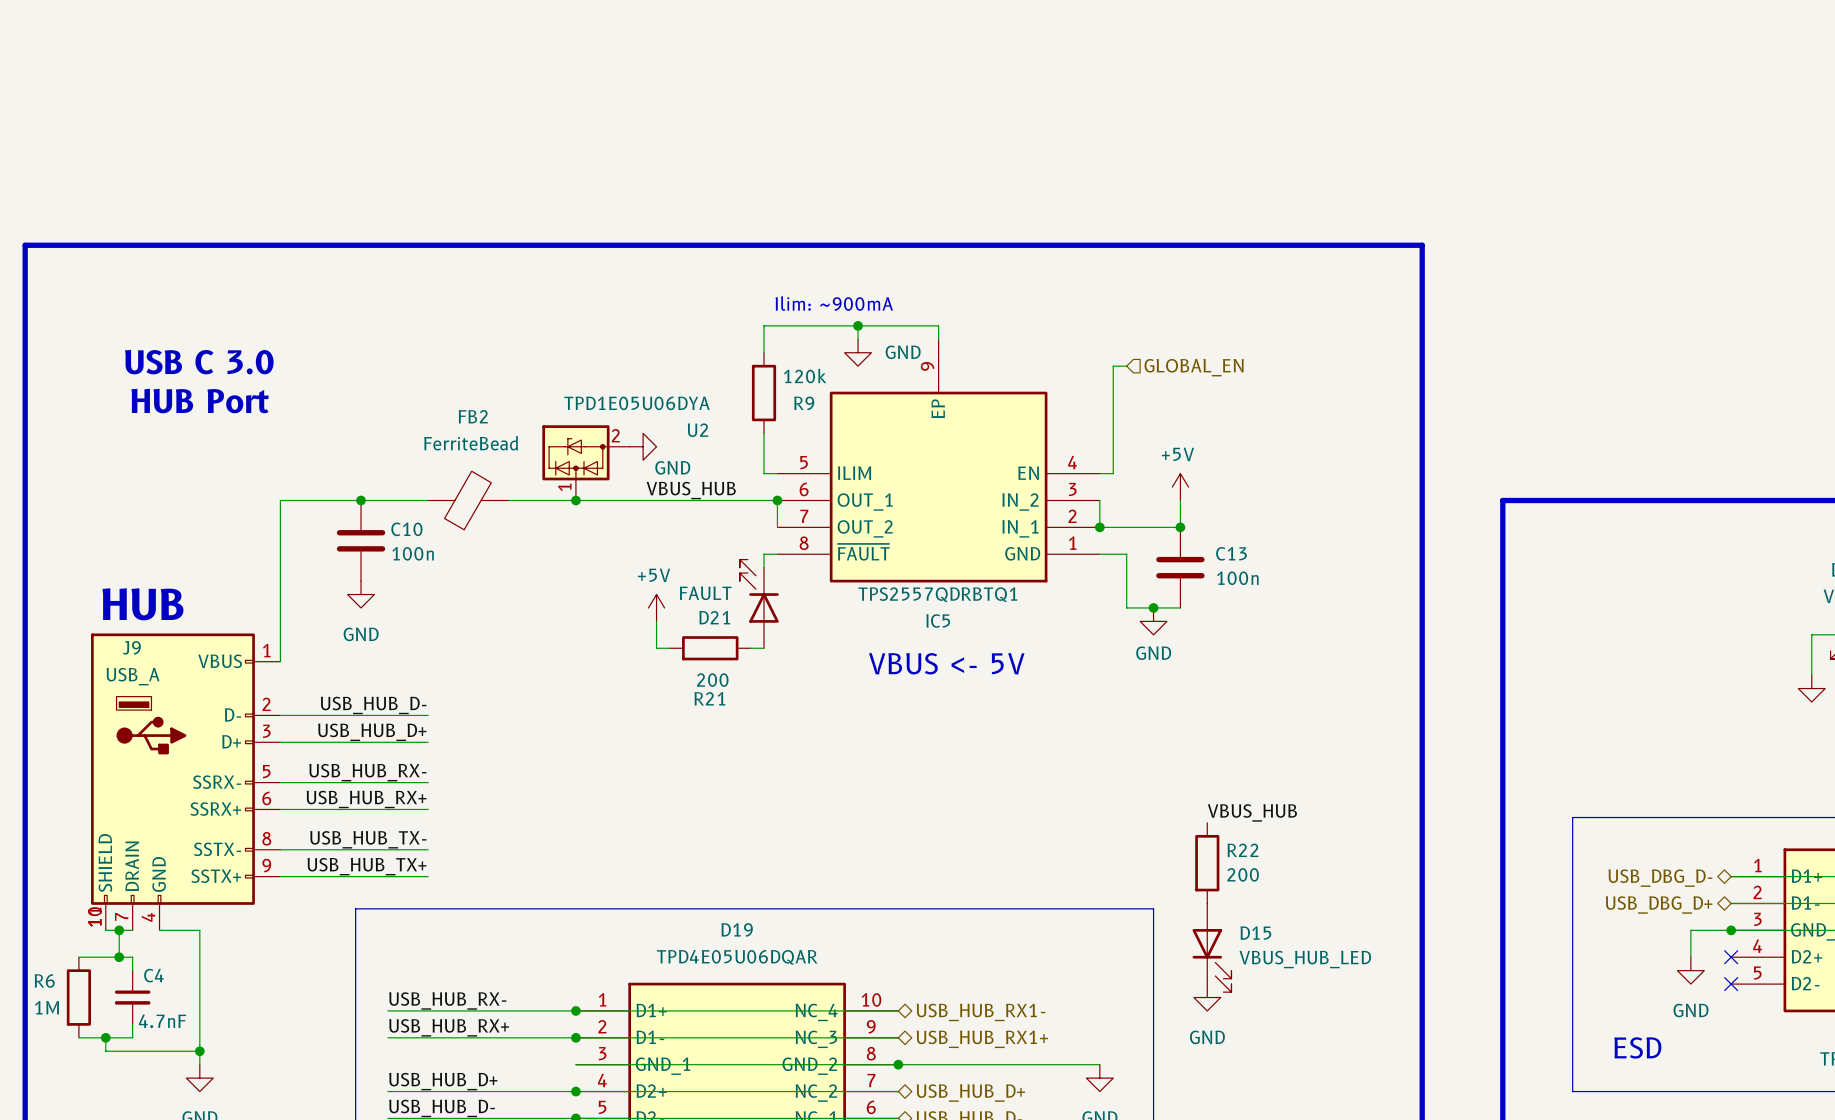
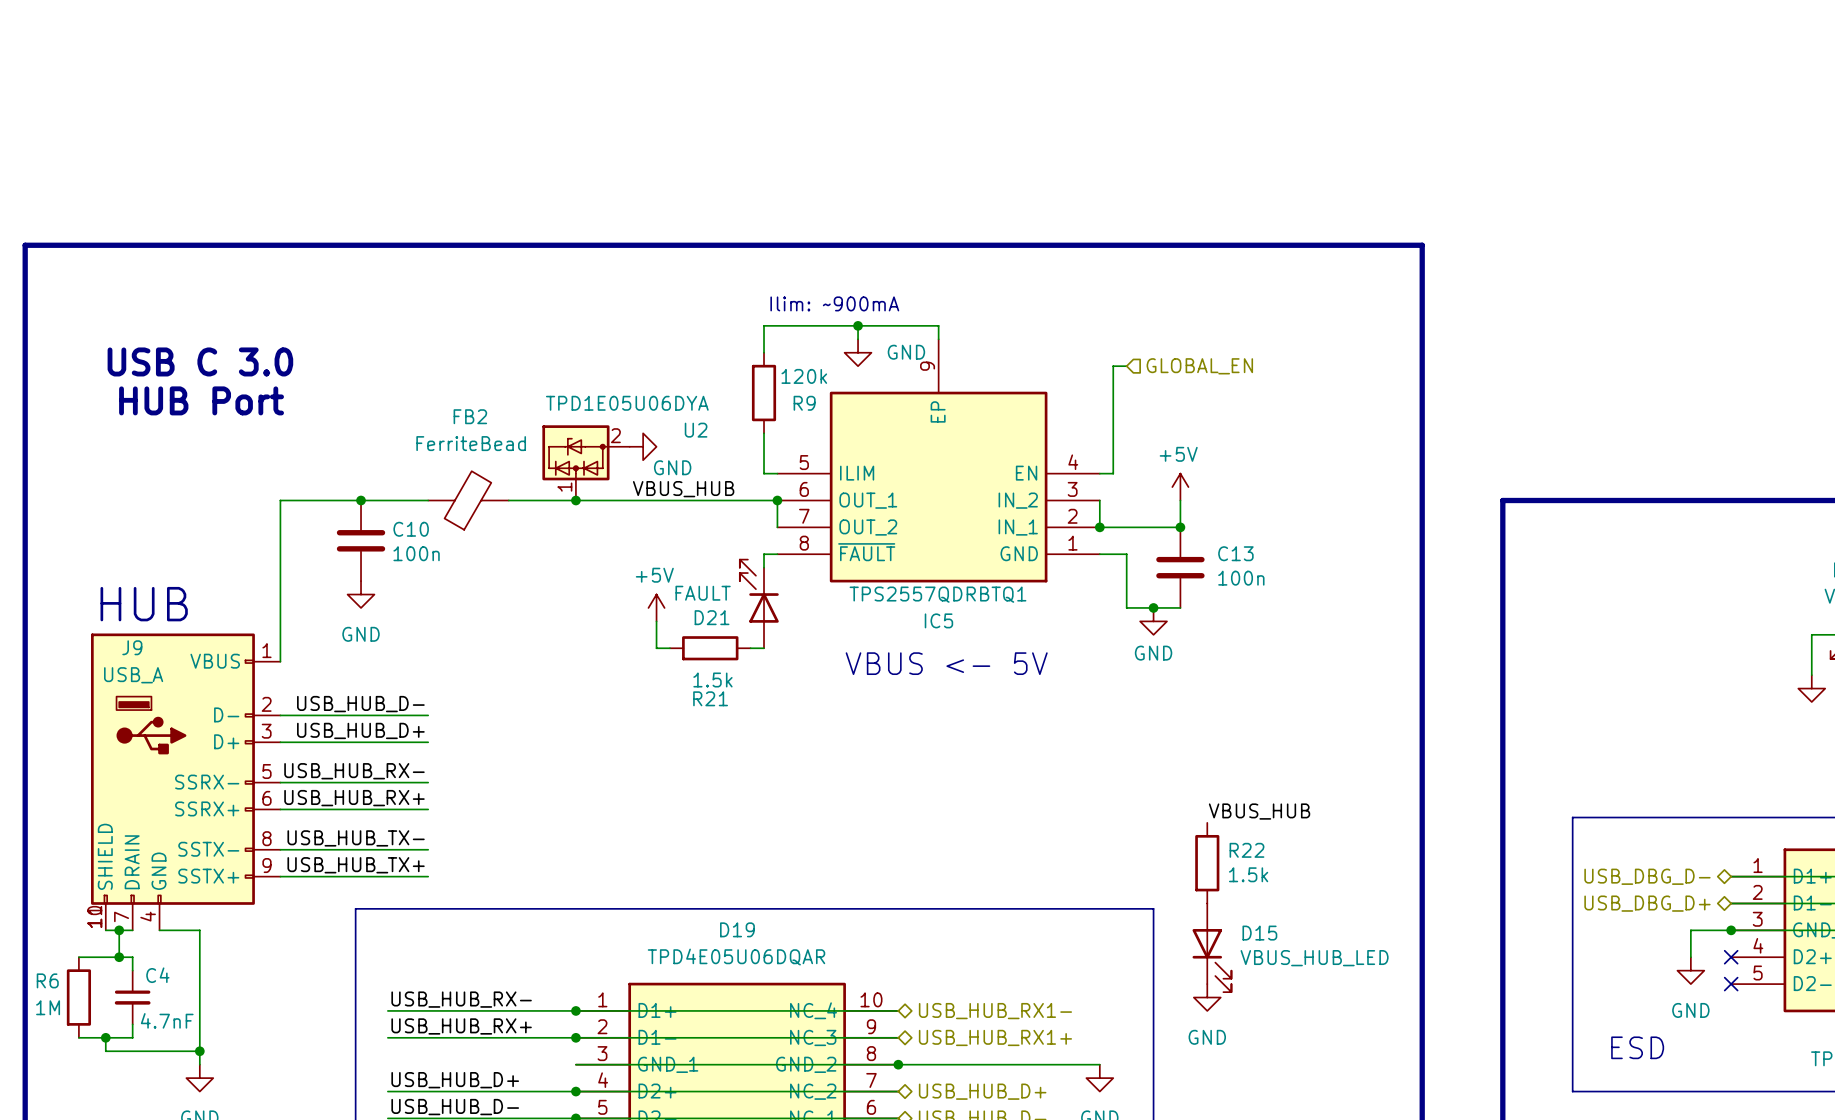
R21 value: 200 (712, 680) -> 1.5k (712, 680)
R22 value: 200 (1243, 874) -> 1.5k (1248, 874)

